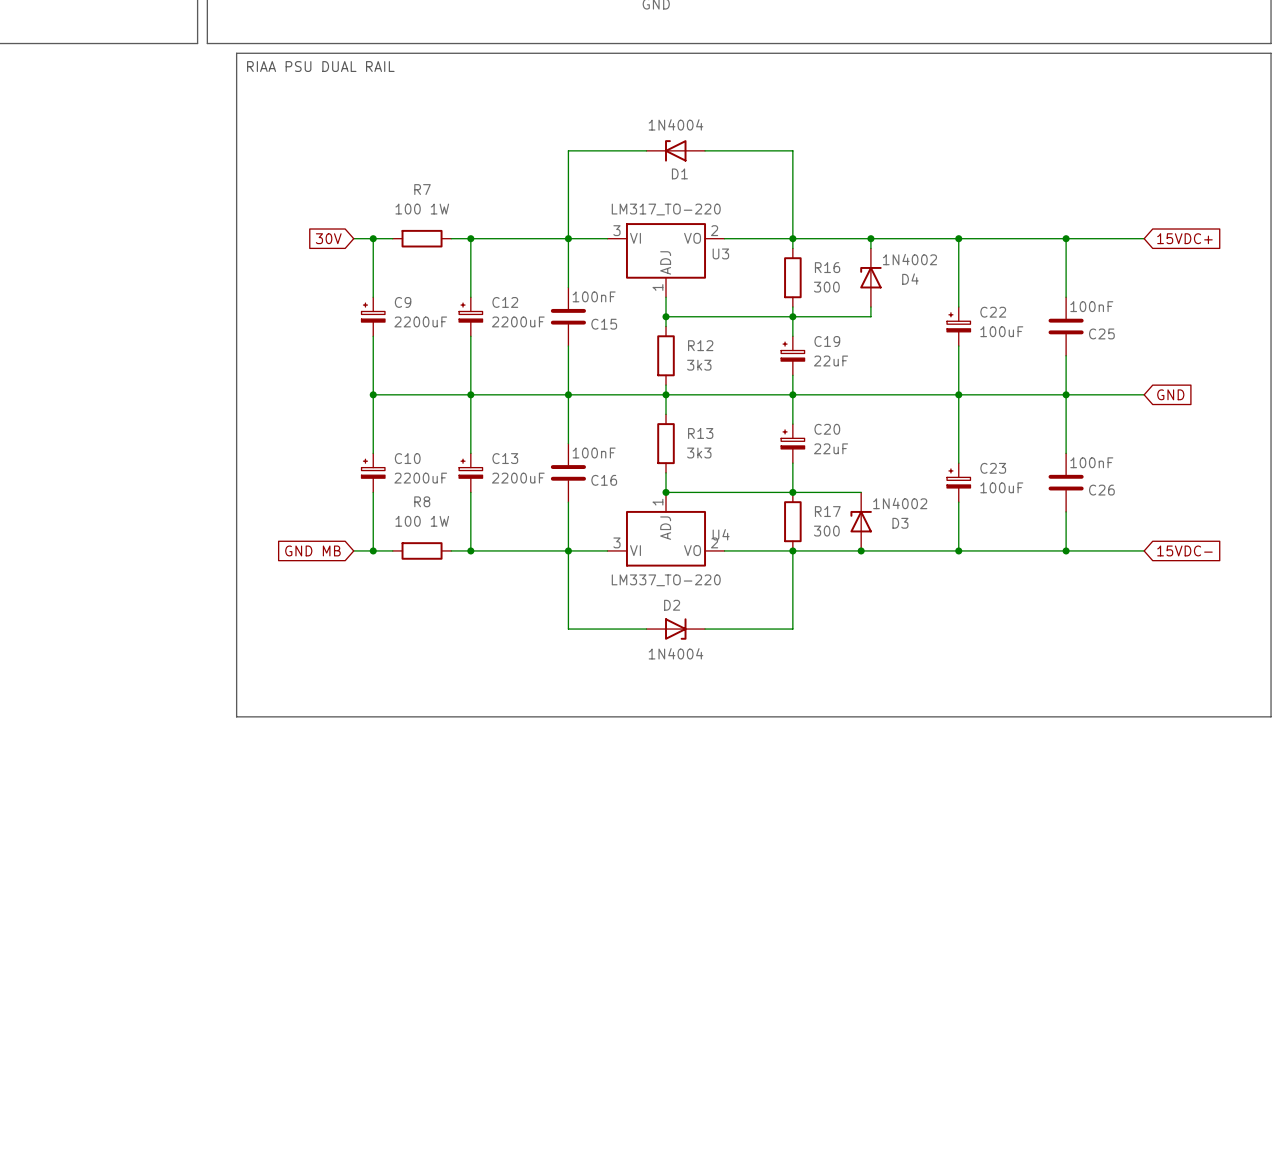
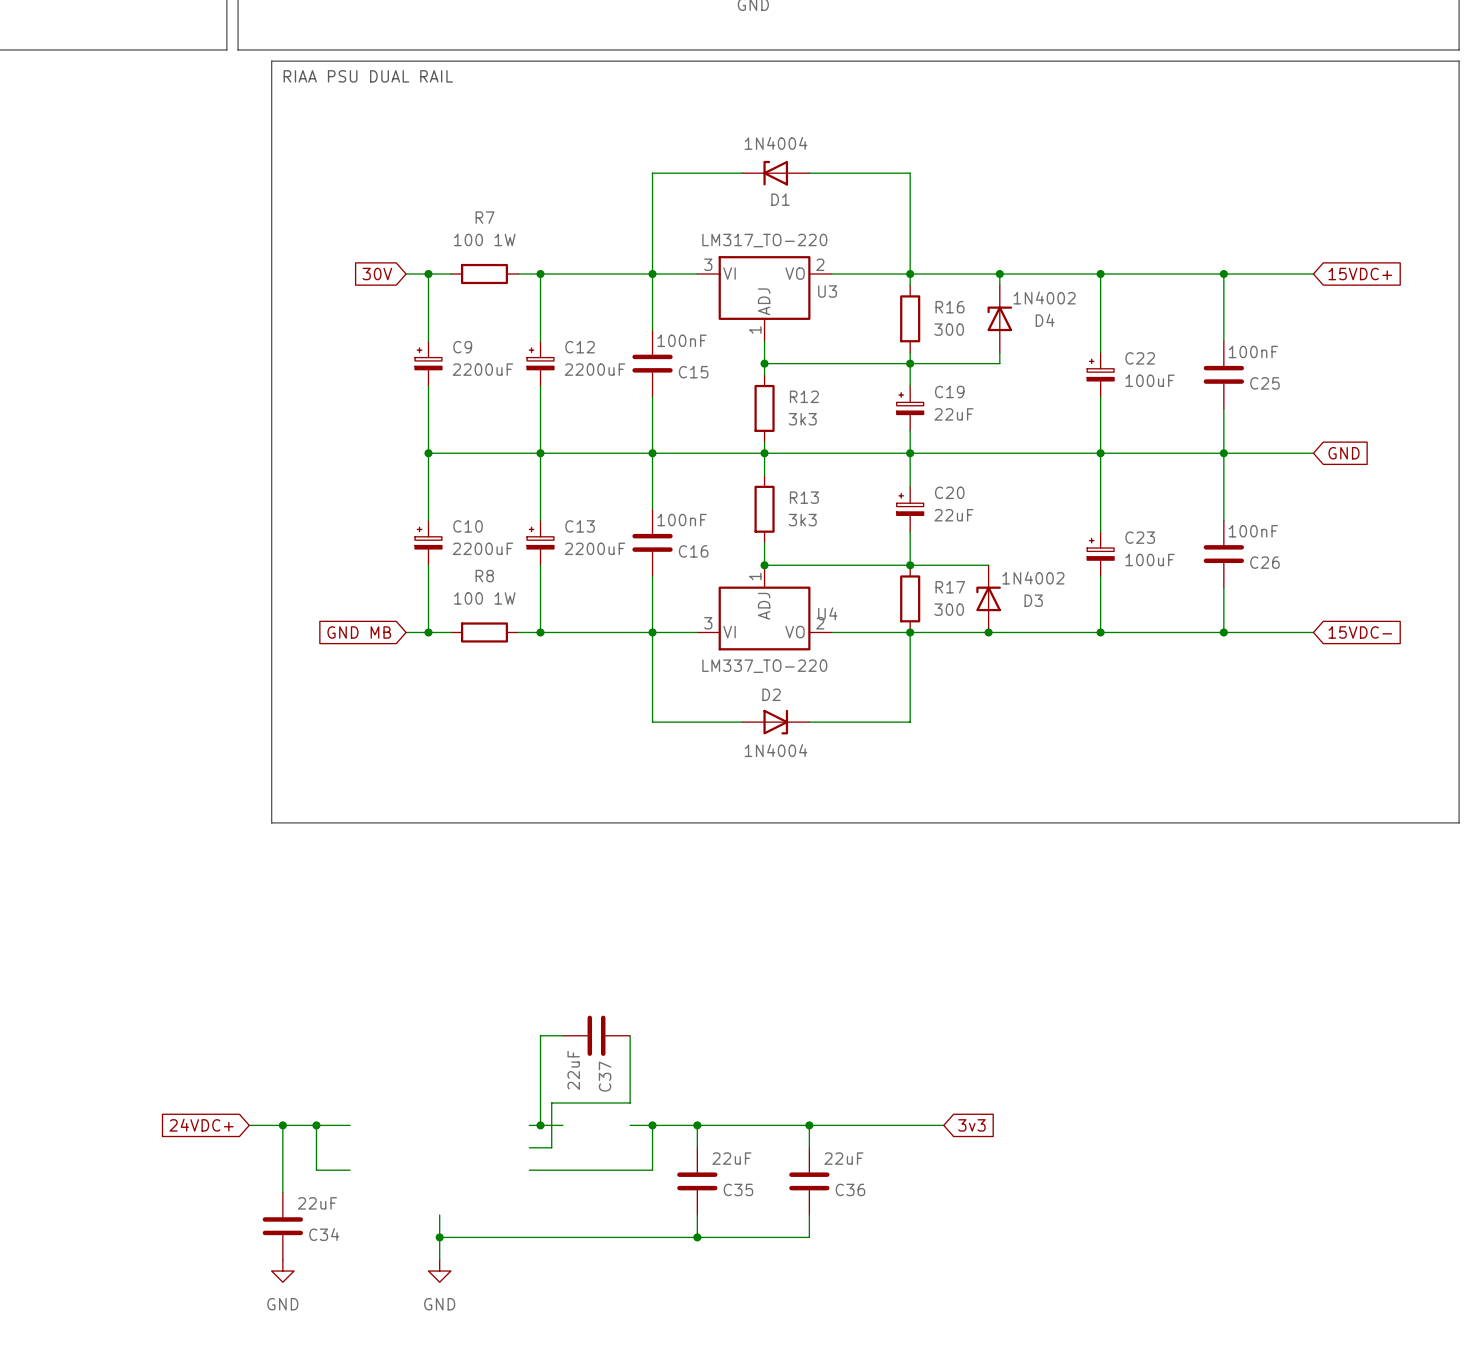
wire: none -> (562, 1035) (540, 1035) (540, 1125)
C37: none -> 22uF (596, 1035)
wire: none -> (630, 1035) (630, 1102) (551, 1102) (551, 1147) (529, 1147)
global label: none -> 24VDC+ (201, 1125)
wire: none -> (249, 1125) (350, 1125)
wire: none -> (282, 1125) (282, 1192)
junction: none -> (282, 1125)
wire: none -> (316, 1125) (316, 1170) (350, 1170)
junction: none -> (316, 1125)
wire: none -> (529, 1125) (562, 1125)
junction: none -> (540, 1125)
wire: none -> (630, 1125) (943, 1125)
wire: none -> (652, 1125) (652, 1170) (529, 1170)
junction: none -> (652, 1125)
wire: none -> (697, 1125) (697, 1147)
junction: none -> (697, 1125)
wire: none -> (809, 1125) (809, 1147)
junction: none -> (809, 1125)
global label: none -> 3v3 (971, 1125)
C35: none -> 22uF (697, 1181)
C36: none -> 22uF (809, 1181)
wire: none -> (439, 1215) (439, 1259)
wire: none -> (697, 1215) (697, 1237)
wire: none -> (809, 1215) (809, 1237) (439, 1237)
C34: none -> 22uF (282, 1226)
junction: none -> (439, 1237)
junction: none -> (697, 1237)
power symbol: none -> GND (282, 1271)
power symbol: none -> GND (439, 1271)

